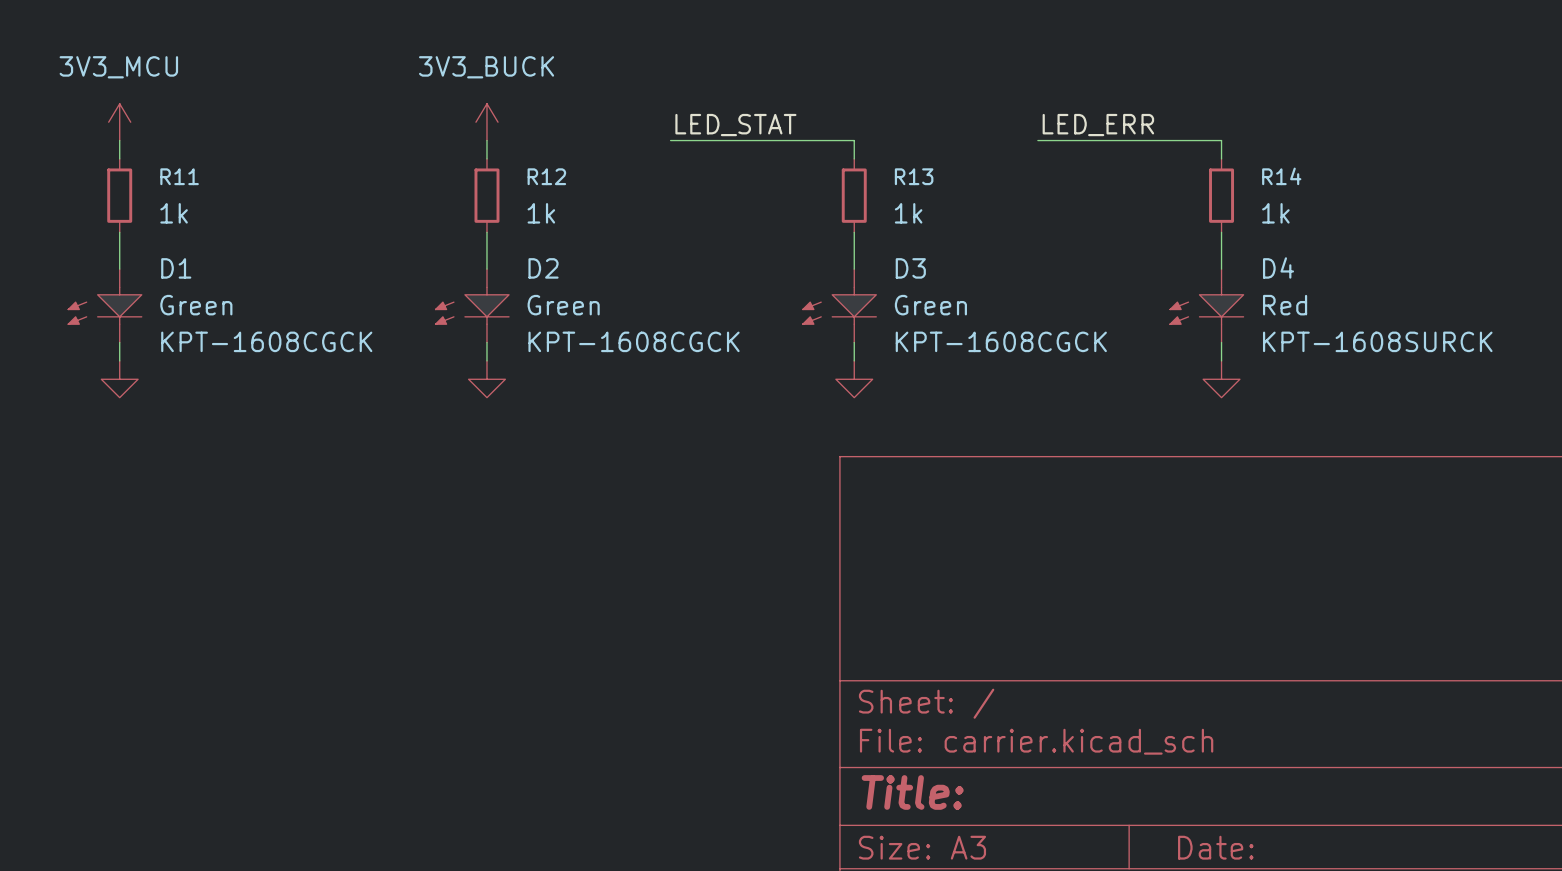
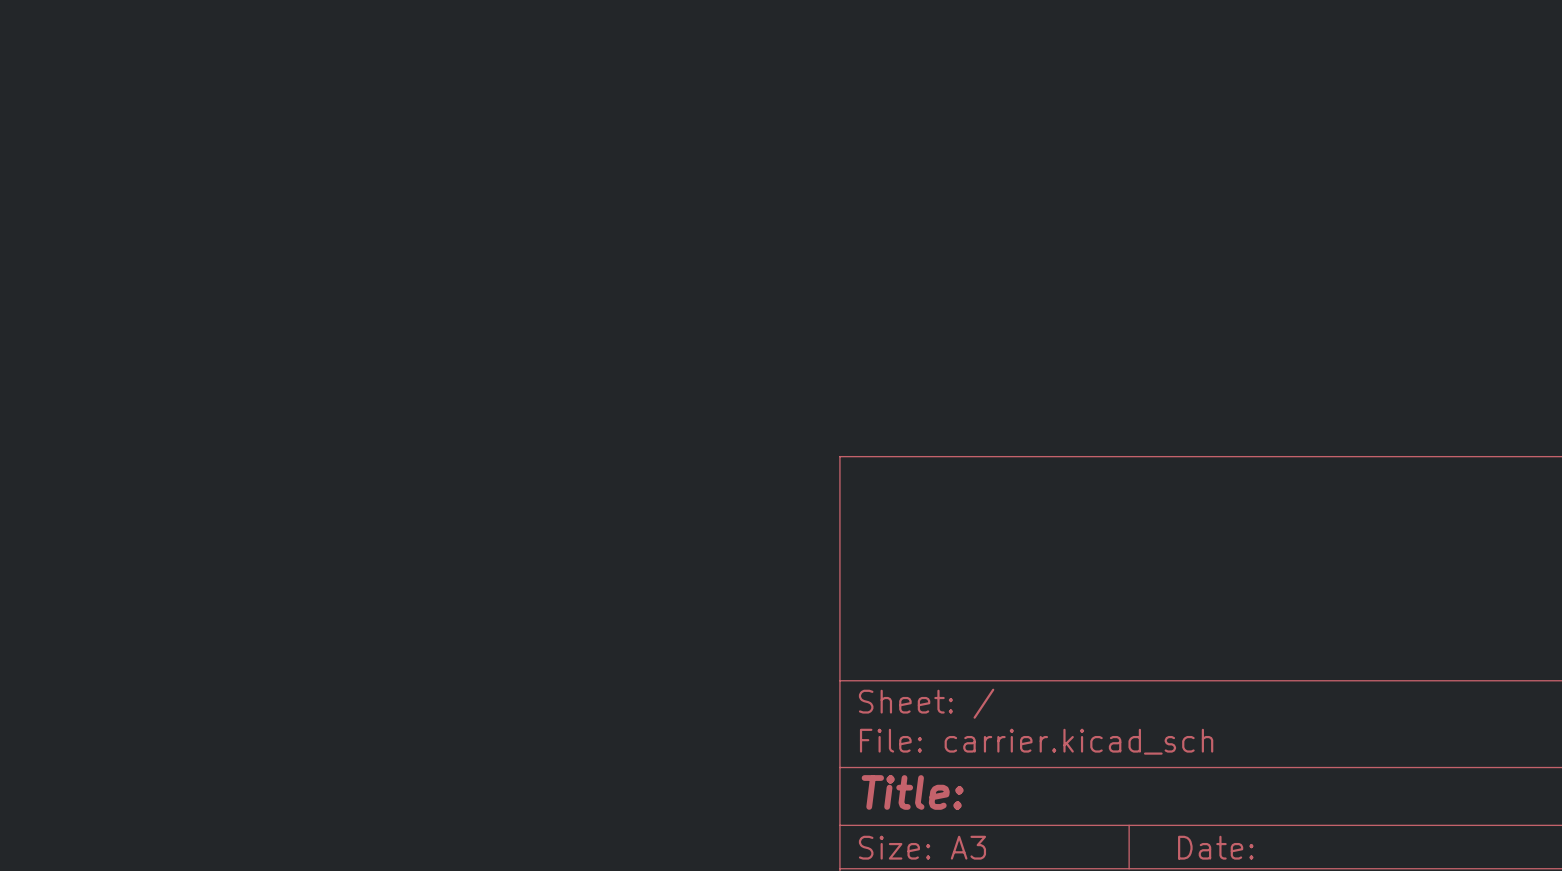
power symbol: 3V3_MCU (119, 122) -> none
power symbol: 3V3_BUCK (486, 122) -> none
label: LED_STAT (735, 125) -> none
label: LED_ERR (1098, 125) -> none
wire: (119, 140) (119, 158) -> none
wire: (486, 140) (486, 158) -> none
wire: (670, 140) (854, 140) (854, 158) -> none
wire: (1037, 140) (1221, 140) (1221, 158) -> none
R11: 1k (119, 195) -> none
R12: 1k (486, 195) -> none
R13: 1k (854, 195) -> none
R14: 1k (1221, 195) -> none
wire: (119, 232) (119, 269) -> none
wire: (486, 232) (486, 269) -> none
wire: (854, 232) (854, 269) -> none
wire: (1221, 232) (1221, 269) -> none
D1: Green (105, 305) -> none
D2: Green (472, 305) -> none
D3: Green (839, 305) -> none
D4: Red (1206, 305) -> none
wire: (119, 342) (119, 360) -> none
wire: (486, 342) (486, 360) -> none
wire: (854, 342) (854, 360) -> none
wire: (1221, 342) (1221, 360) -> none
power symbol: (119, 379) -> none
power symbol: (486, 379) -> none
power symbol: (854, 379) -> none
power symbol: (1221, 379) -> none

